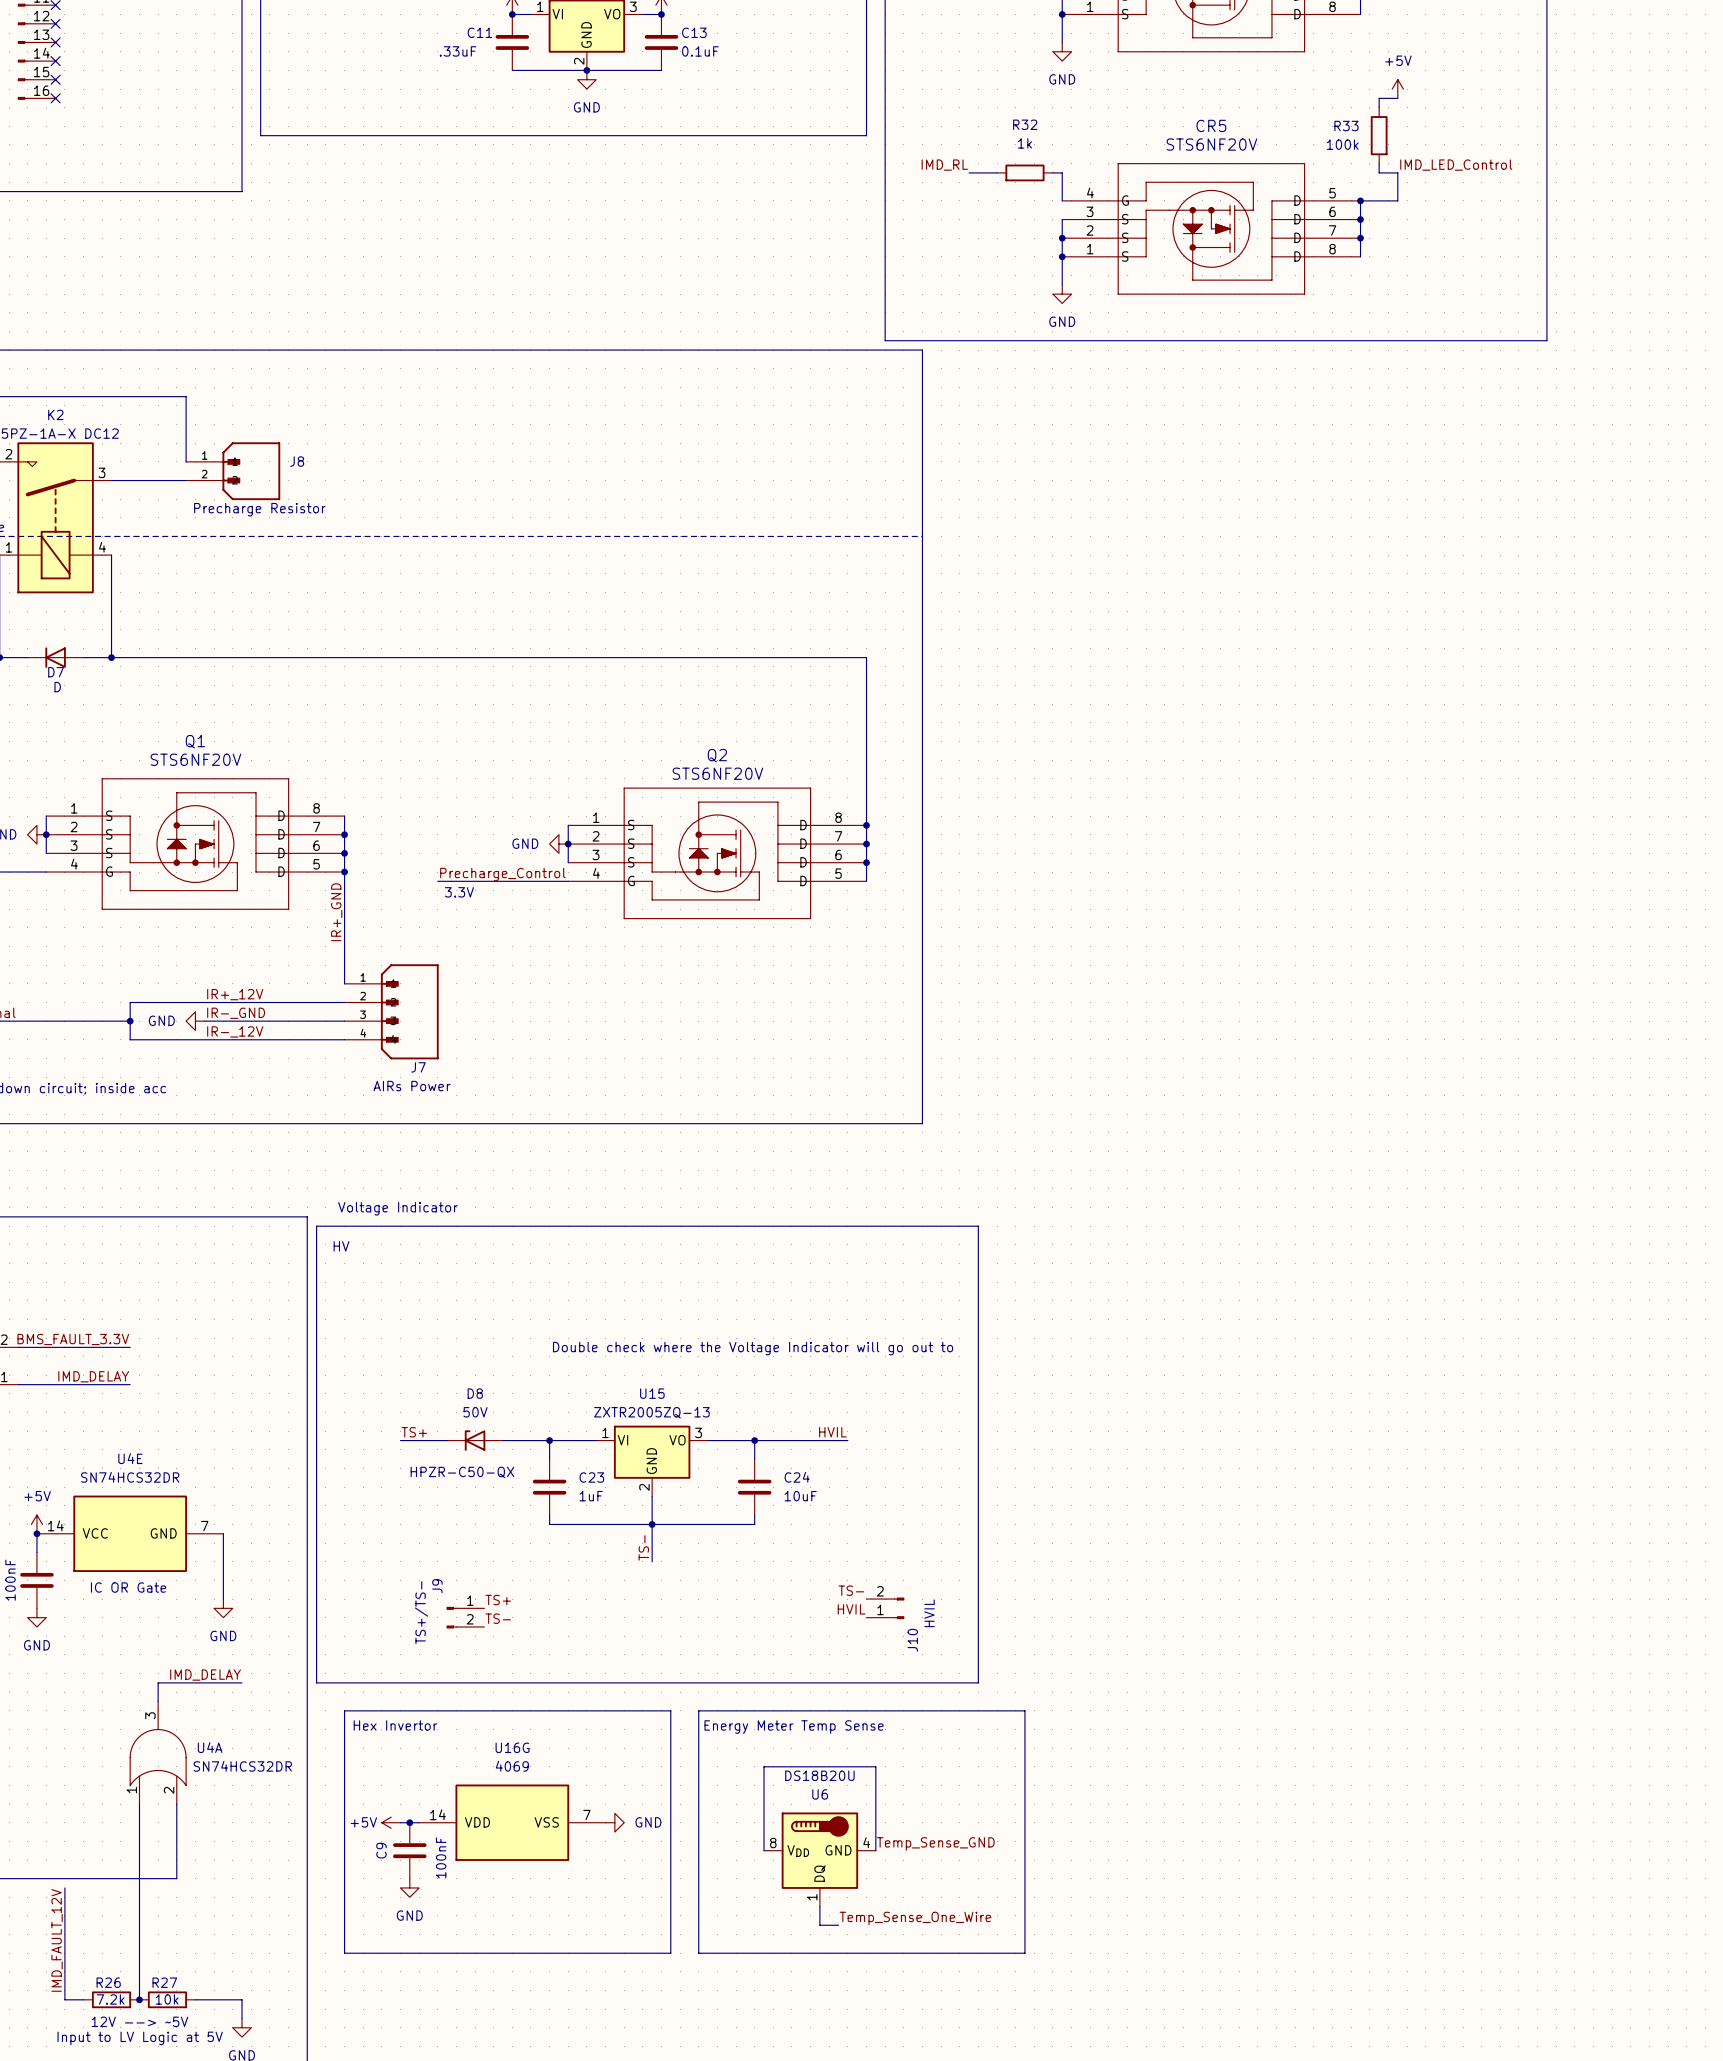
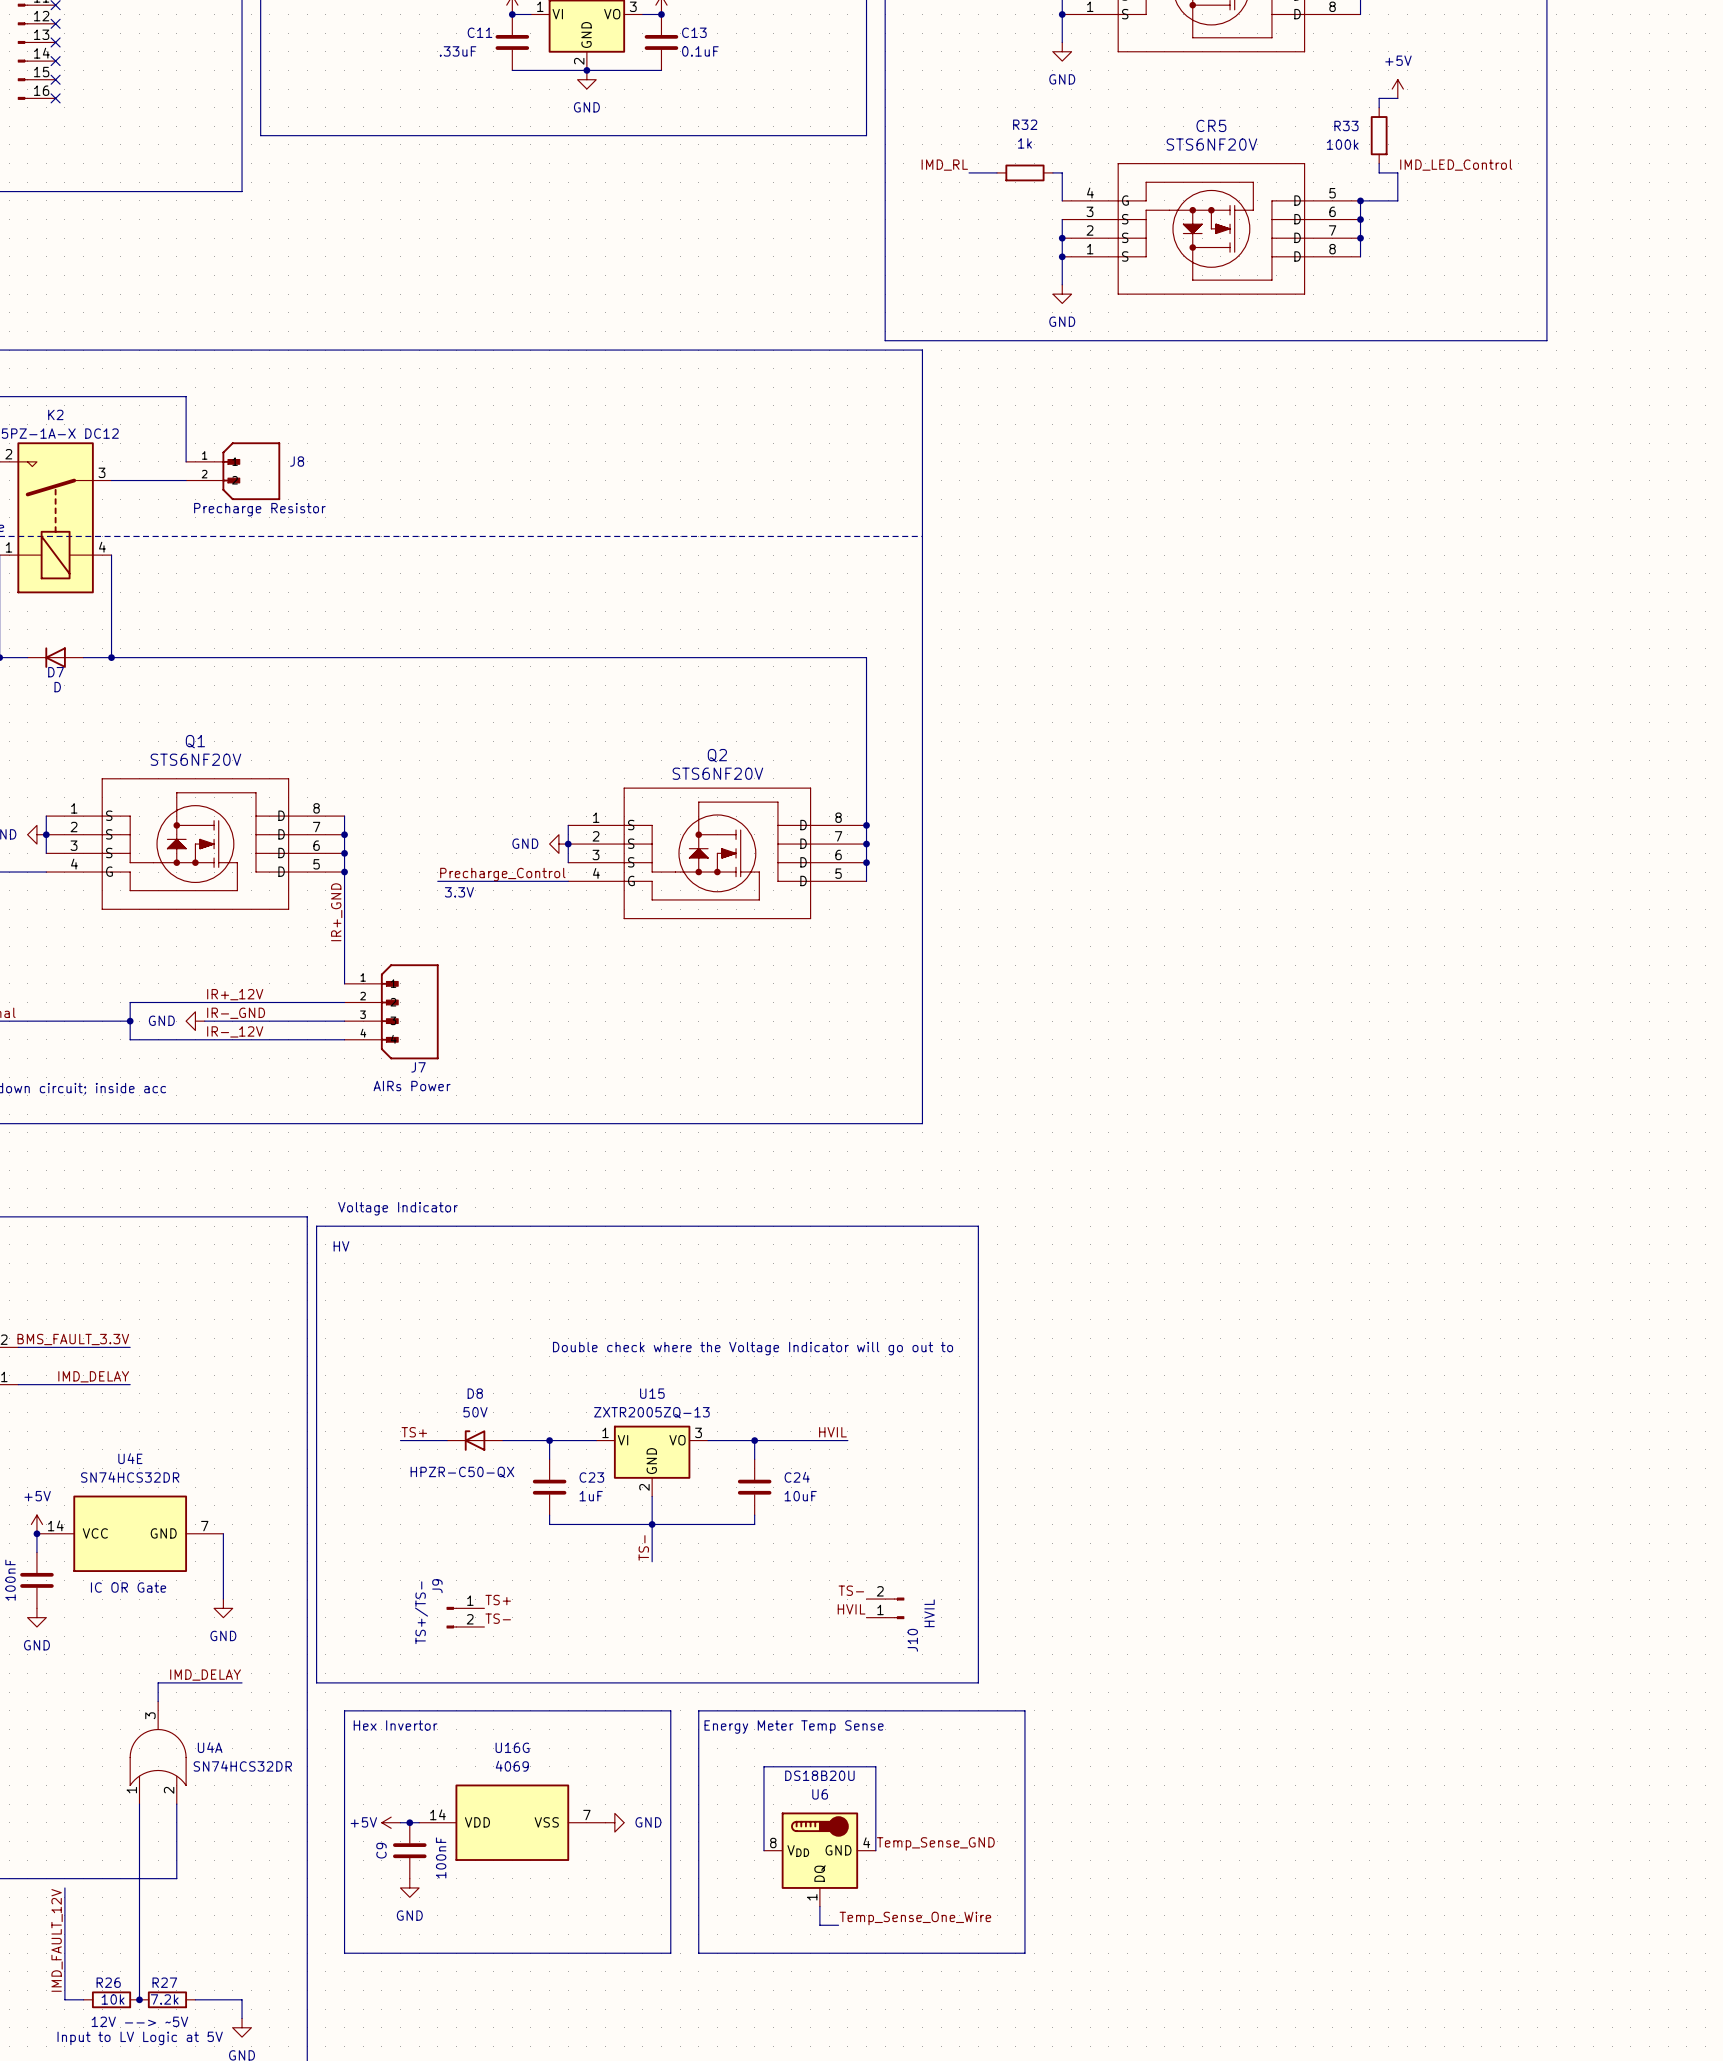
R26 value: 7.2k (110, 1999) -> 10k (113, 1999)
R27 value: 10k (167, 1999) -> 7.2k (164, 1999)

